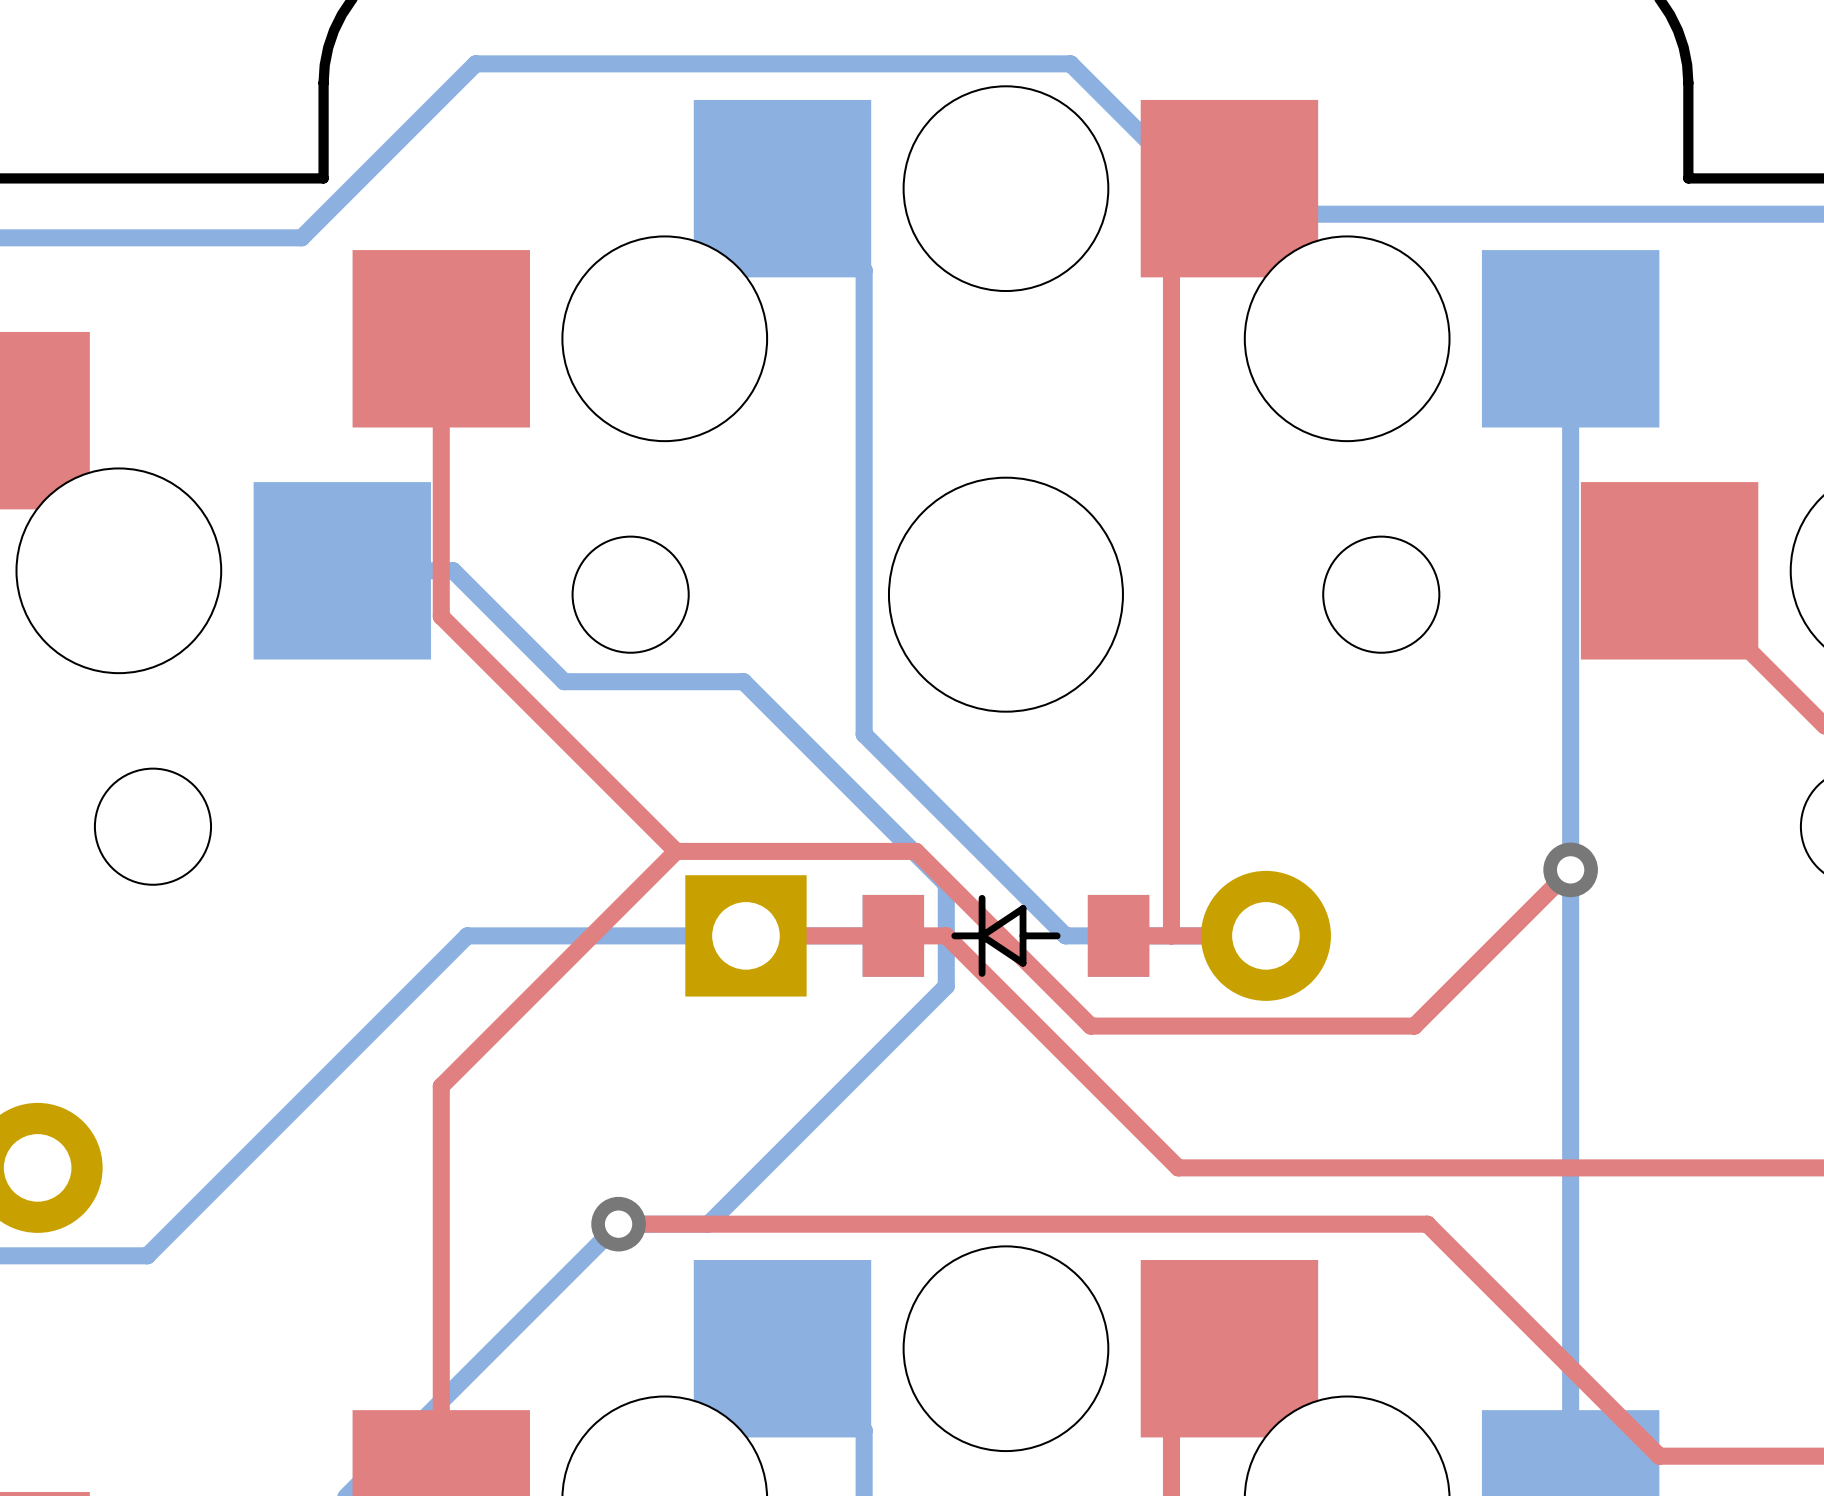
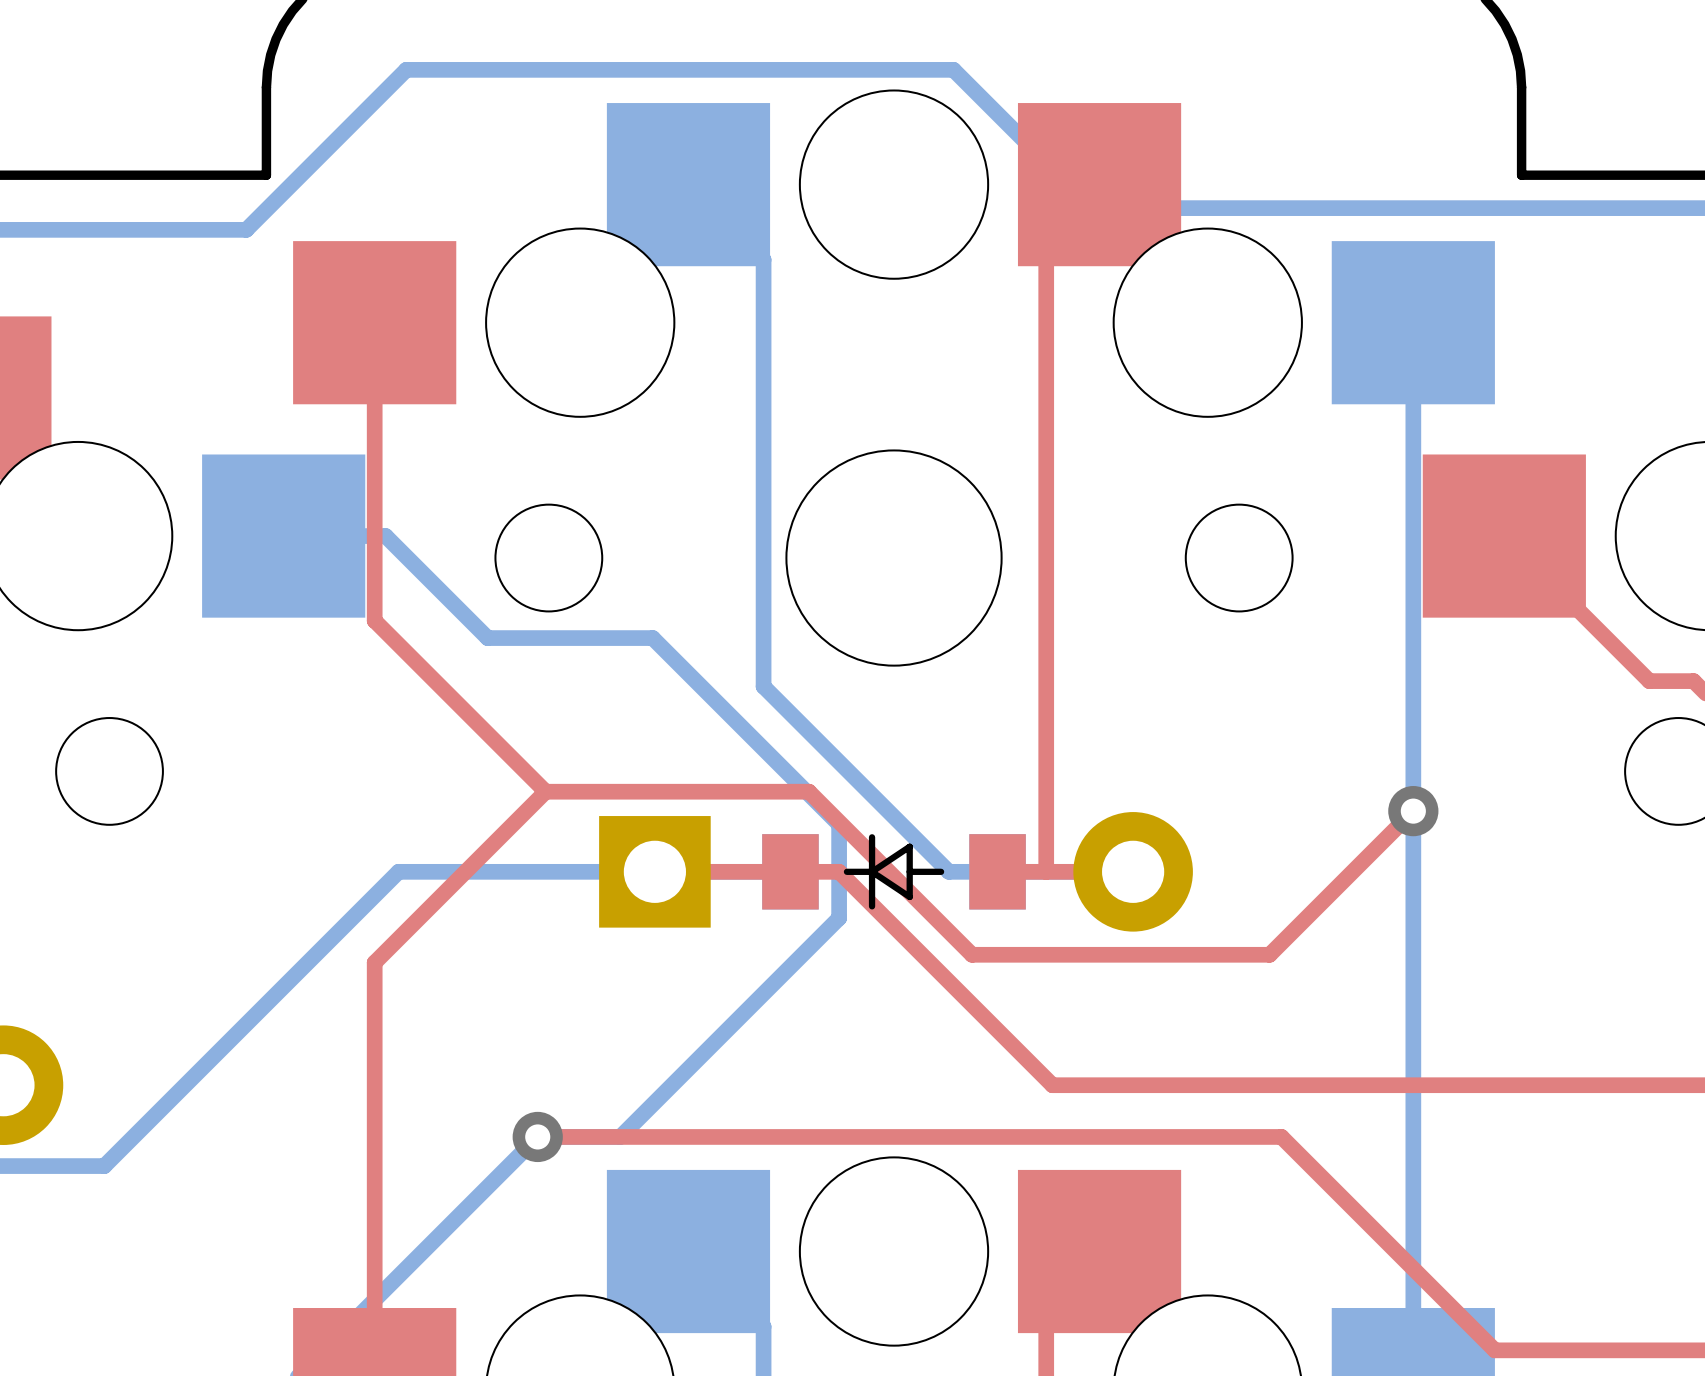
top track: (441, 616) (676, 851) -> (374, 578) (374, 620) (545, 791)
top track: (676, 851) (916, 851) -> (545, 791) (808, 791) (811, 794)
top track: (676, 851) (441, 1086) -> (545, 791) (374, 962) (374, 1010)

